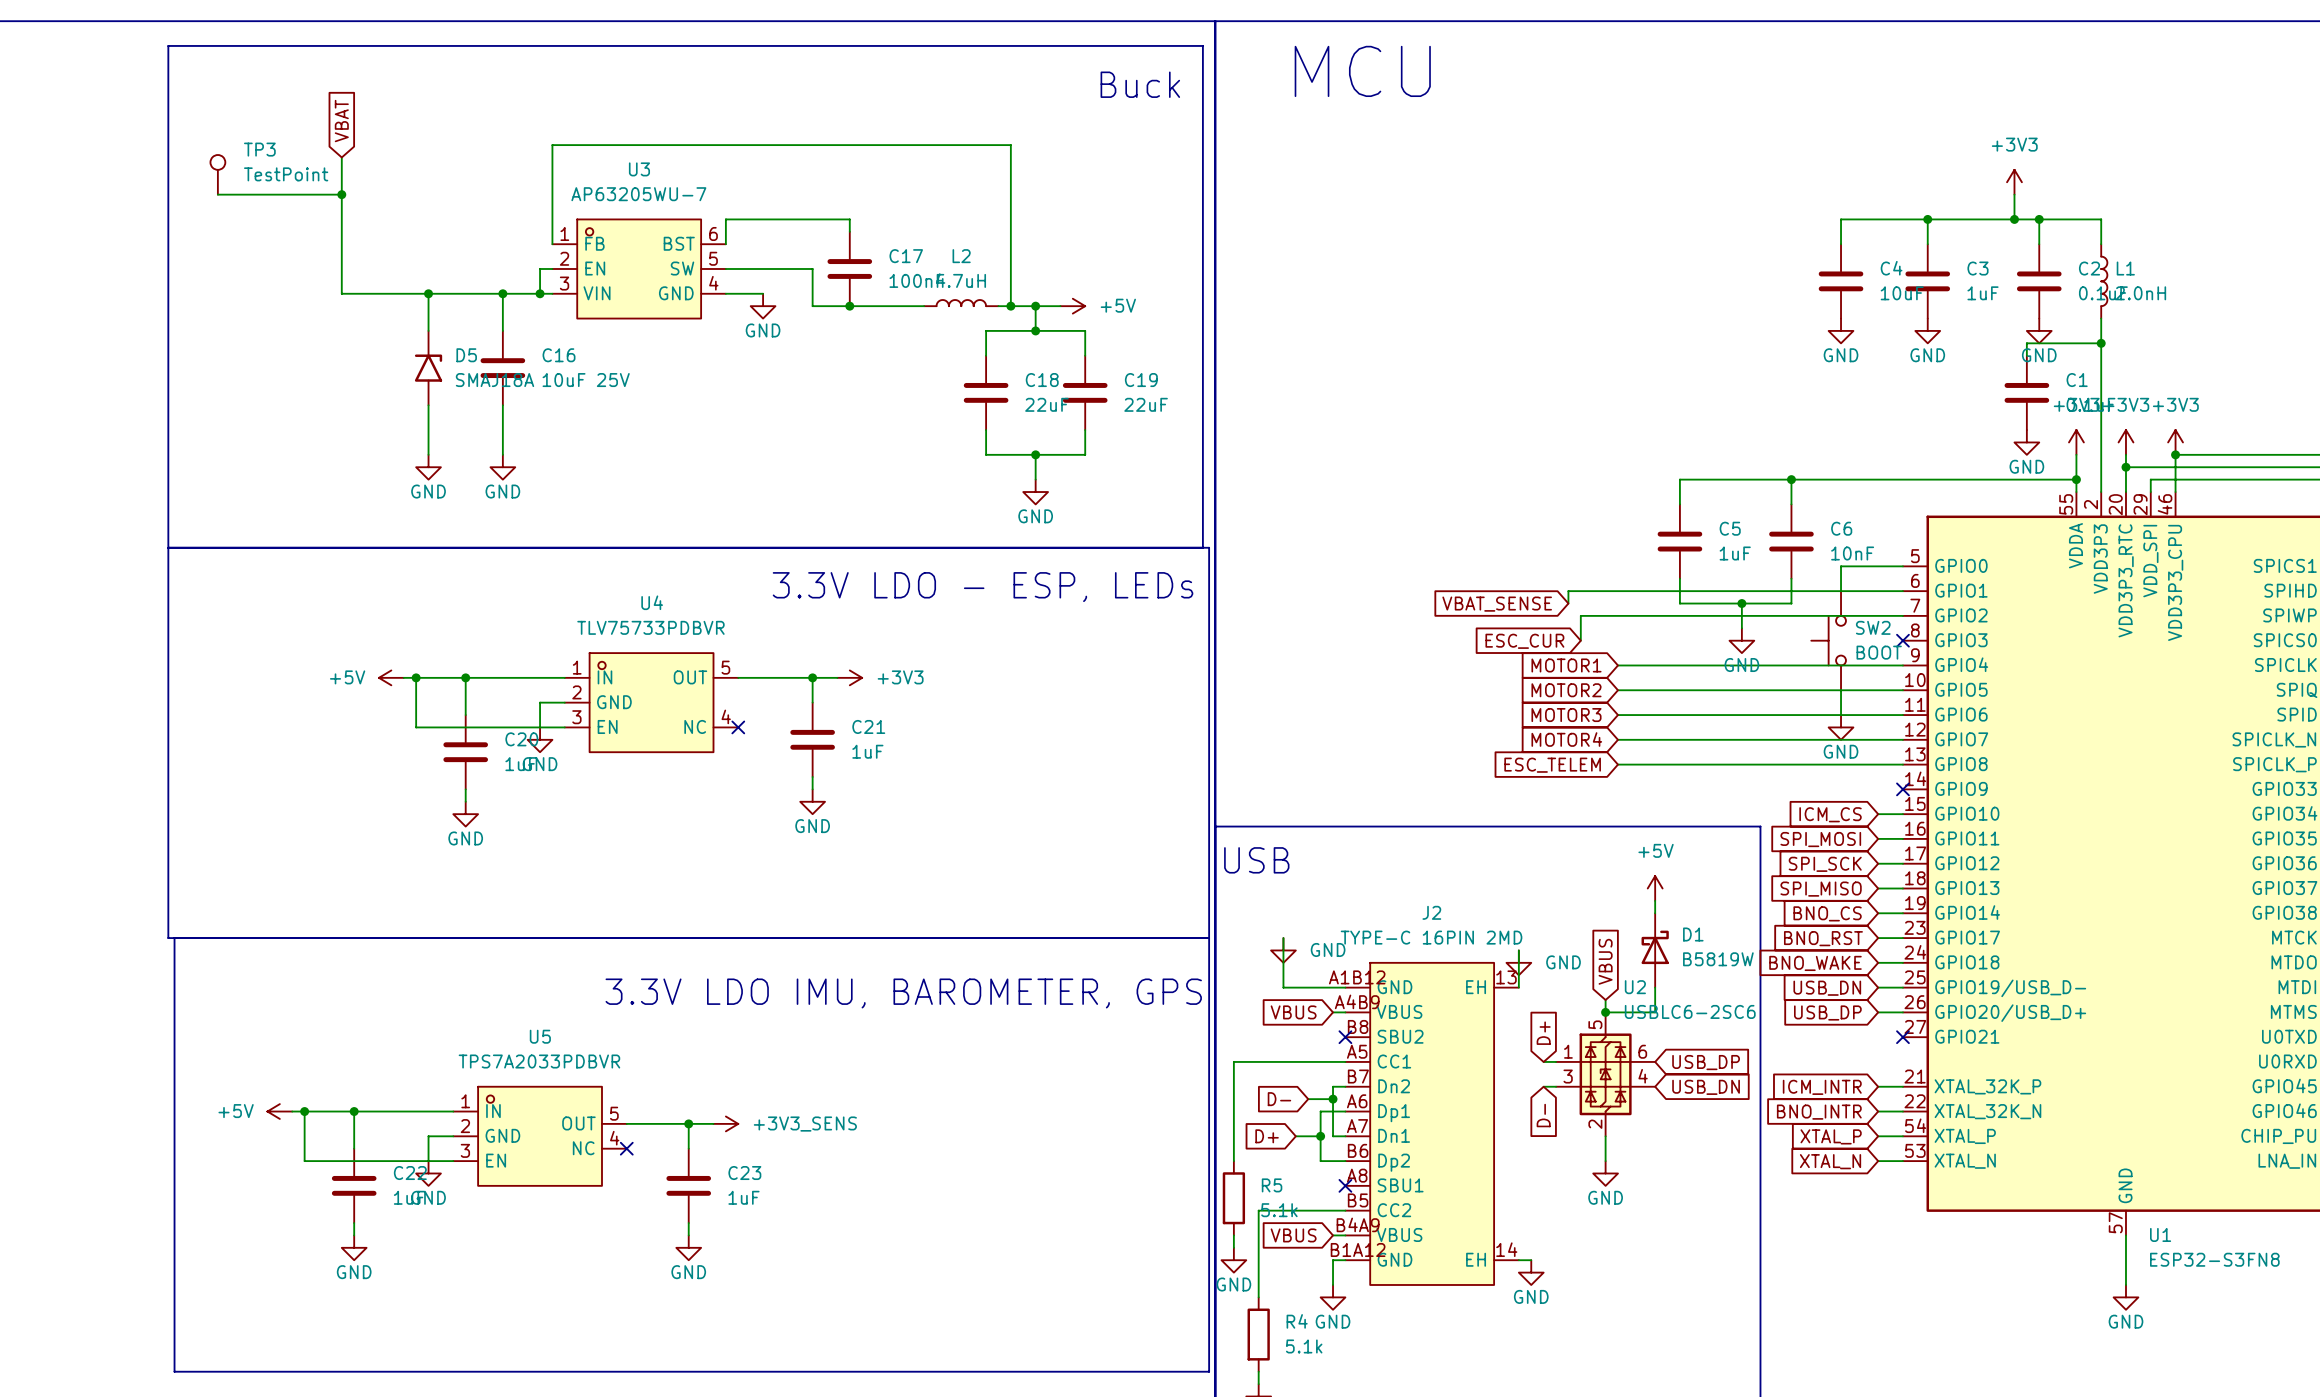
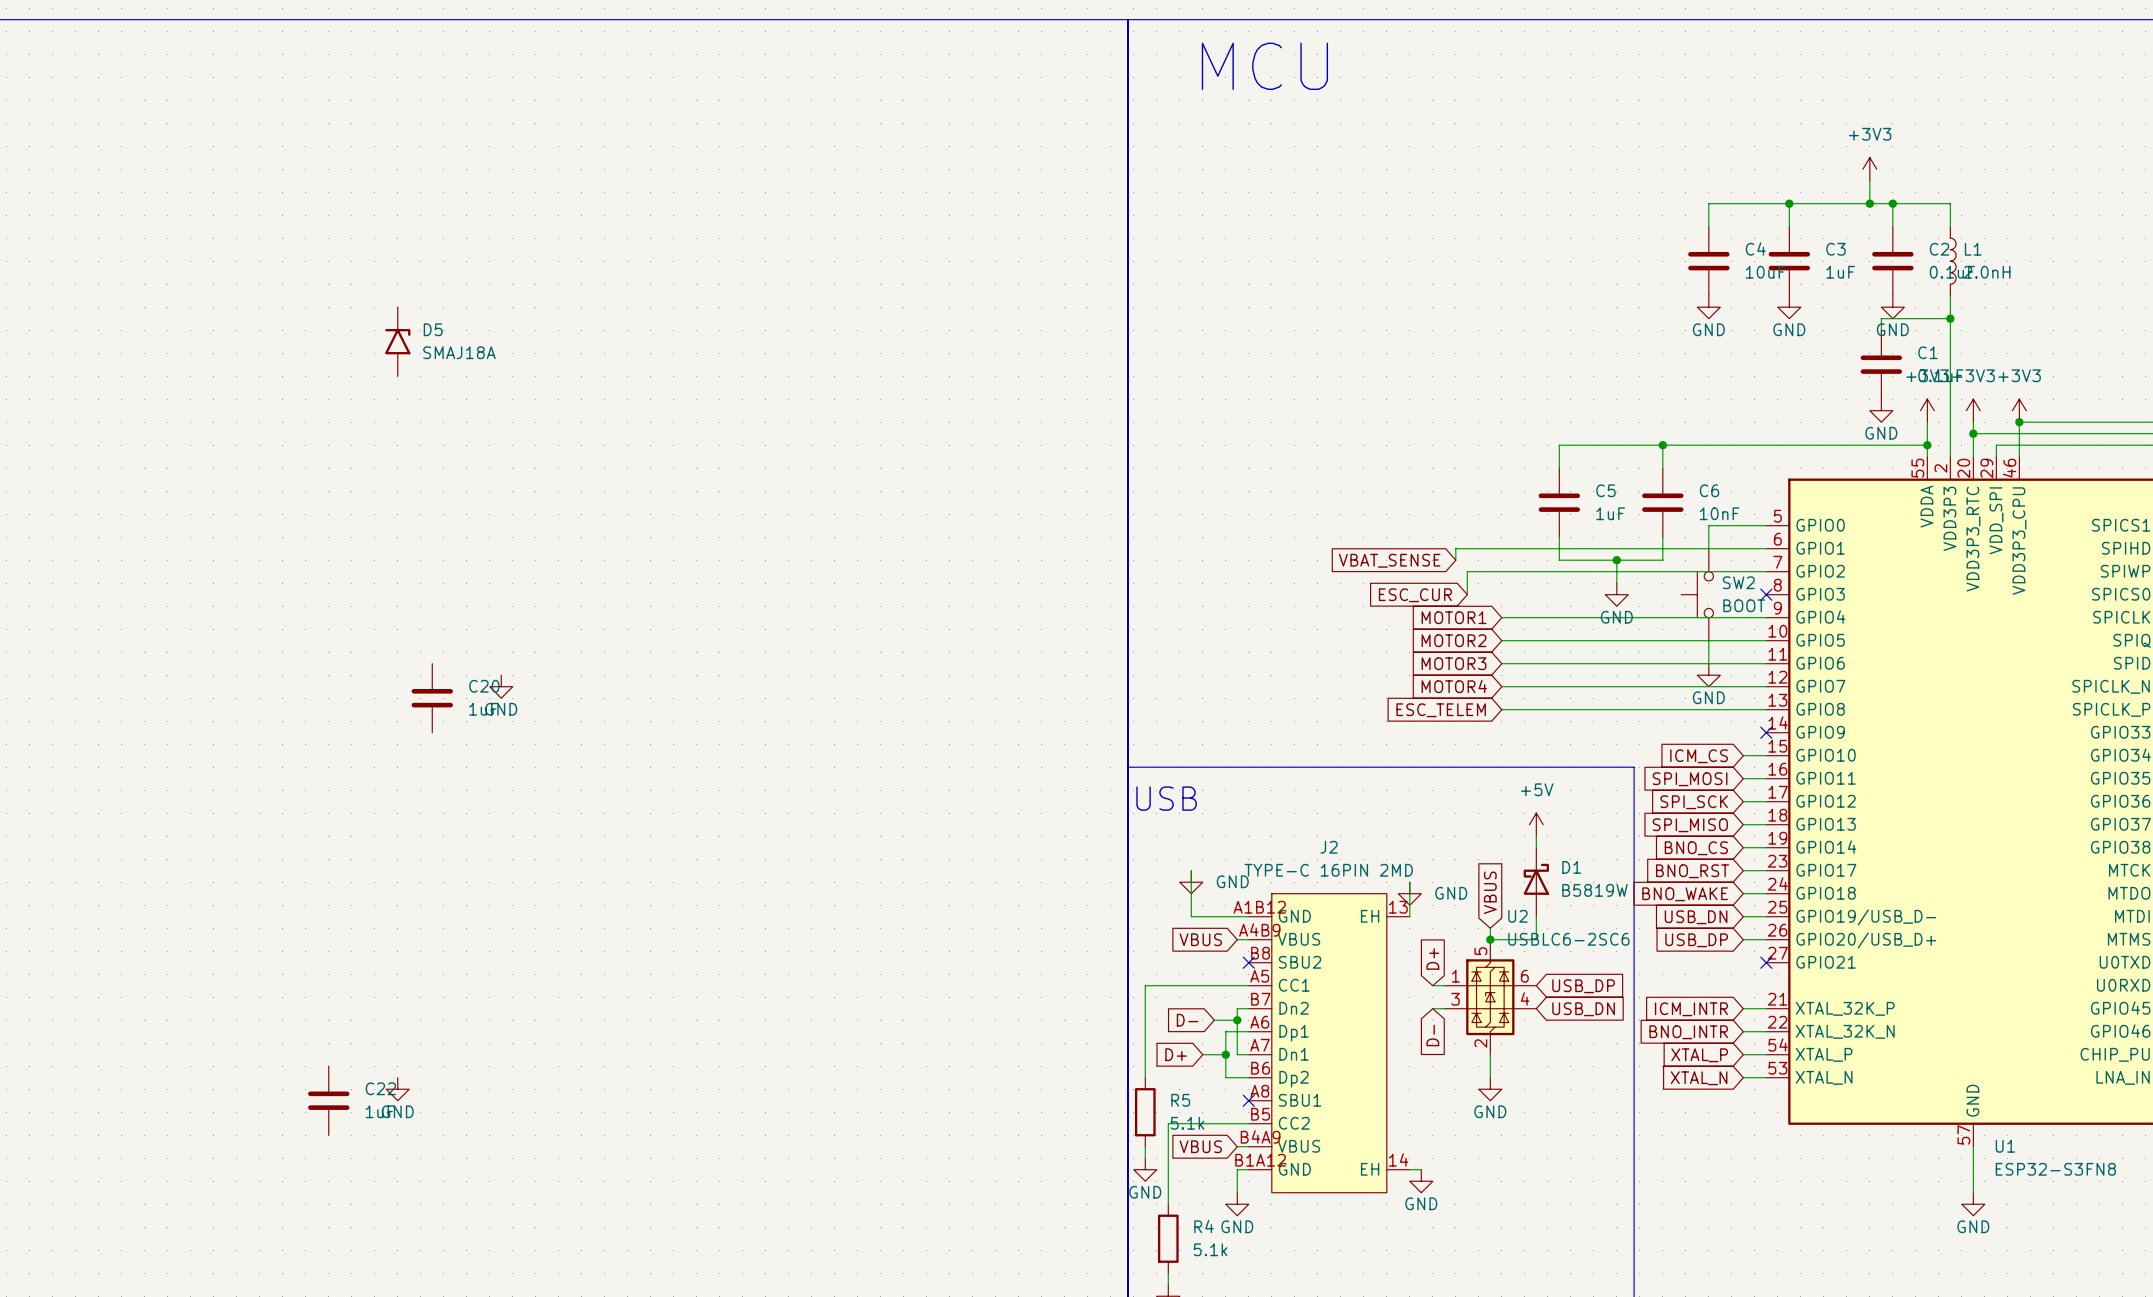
text: Buck (1140, 84) -> none
global label: VBAT (341, 121) -> none
wire: (341, 157) (341, 293) (552, 293) -> none
TP3: TestPoint (217, 174) -> none
wire: (217, 194) (341, 194) -> none
junction: (341, 194) -> none
wire: (849, 231) (849, 219) (725, 219) (725, 244) -> none
wire: (552, 244) (552, 145) (1010, 145) (1010, 306) -> none
wire: (552, 268) (540, 268) (540, 293) -> none
U3: AP63205WU-7 (639, 268) -> none
wire: (725, 268) (812, 268) (812, 306) (924, 306) -> none
C17: 100nF (849, 268) -> none
wire: (428, 293) (428, 330) -> none
junction: (428, 293) -> none
wire: (502, 293) (502, 330) -> none
junction: (502, 293) -> none
junction: (540, 293) -> none
wire: (725, 293) (763, 293) -> none
L2: 4.7uH (961, 303) -> none
power symbol: GND (763, 306) -> none
junction: (849, 306) -> none
wire: (998, 306) (1060, 306) -> none
junction: (1010, 306) -> none
wire: (1035, 306) (1035, 330) -> none
junction: (1035, 306) -> none
power symbol: +5V (1072, 306) -> none
junction: (1035, 330) -> none
wire: (986, 355) (986, 330) (1085, 330) (1085, 355) -> none
C16: 10uF 25V (502, 368) -> none
C18: 22uF (986, 392) -> none
C19: 22uF (1085, 392) -> none
wire: (428, 405) (428, 454) -> none
wire: (502, 405) (502, 454) -> none
wire: (986, 430) (986, 454) (1085, 454) (1085, 430) -> none
wire: (1035, 454) (1035, 479) -> none
junction: (1035, 454) -> none
power symbol: GND (428, 467) -> none
power symbol: GND (502, 467) -> none
power symbol: GND (1035, 492) -> none
line: (168, 547) (1209, 547) (1209, 1371) (174, 1371) (174, 938) -> none
line: (1202, 547) (1202, 45) (168, 45) (168, 938) (1209, 938) -> none
text: 3.3V LDO - ESP, LEDs (983, 587) -> none
power symbol: +5V (391, 677) -> none
wire: (403, 677) (564, 677) -> none
wire: (416, 677) (416, 727) (564, 727) -> none
junction: (416, 677) -> none
wire: (465, 677) (465, 715) -> none
junction: (465, 677) -> none
wire: (738, 677) (837, 677) -> none
wire: (812, 677) (812, 702) -> none
junction: (812, 677) -> none
power symbol: +3V3 (849, 677) -> none
wire: (564, 702) (540, 702) (540, 727) -> none
U4: TLV75733PDBVR (651, 702) -> none
no-connect mark: (738, 727) -> none
C21: 1uF (812, 739) -> none
wire: (812, 776) (812, 789) -> none
wire: (465, 789) (465, 801) -> none
power symbol: GND (812, 801) -> none
power symbol: GND (465, 814) -> none
text: 3.3V LDO IMU, BAROMETER, GPS (903, 993) -> none
power symbol: +5V (279, 1111) -> none
wire: (292, 1111) (453, 1111) -> none
wire: (304, 1111) (304, 1161) (453, 1161) -> none
junction: (304, 1111) -> none
wire: (354, 1111) (354, 1148) -> none
junction: (354, 1111) -> none
wire: (626, 1123) (713, 1123) -> none
wire: (688, 1123) (688, 1148) -> none
junction: (688, 1123) -> none
power symbol: +3V3_SENS (725, 1123) -> none
wire: (453, 1136) (428, 1136) (428, 1161) -> none
U5: TPS7A2033PDBVR (540, 1136) -> none
no-connect mark: (626, 1148) -> none
C23: 1uF (688, 1185) -> none
wire: (354, 1223) (354, 1235) -> none
wire: (688, 1223) (688, 1235) -> none
power symbol: GND (354, 1247) -> none
power symbol: GND (688, 1247) -> none

